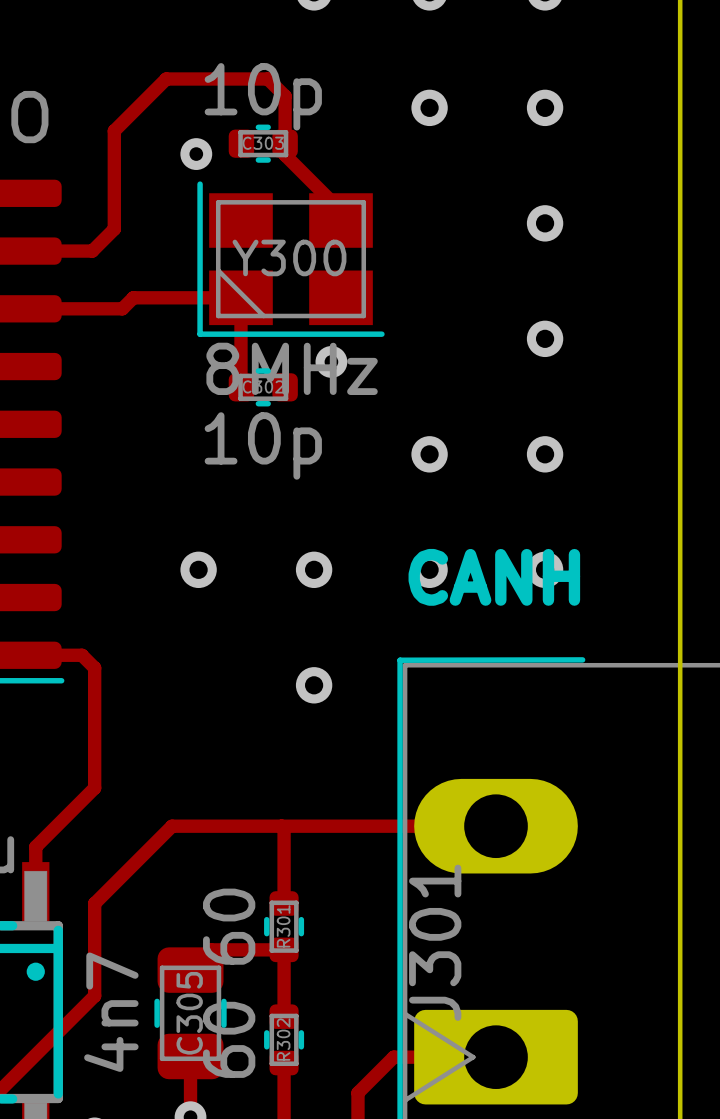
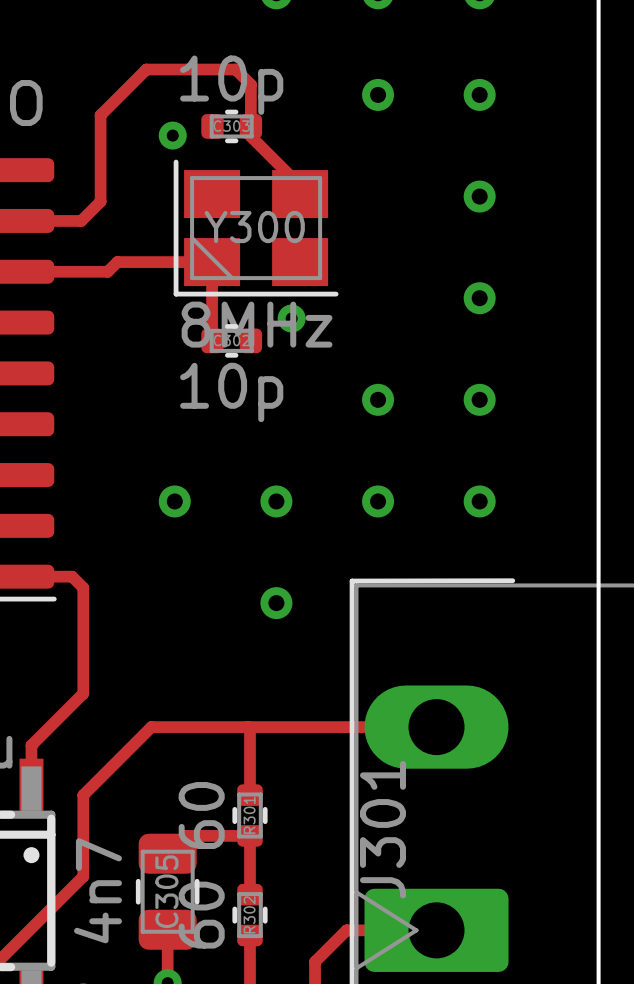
text: CANH (494, 577) -> none

